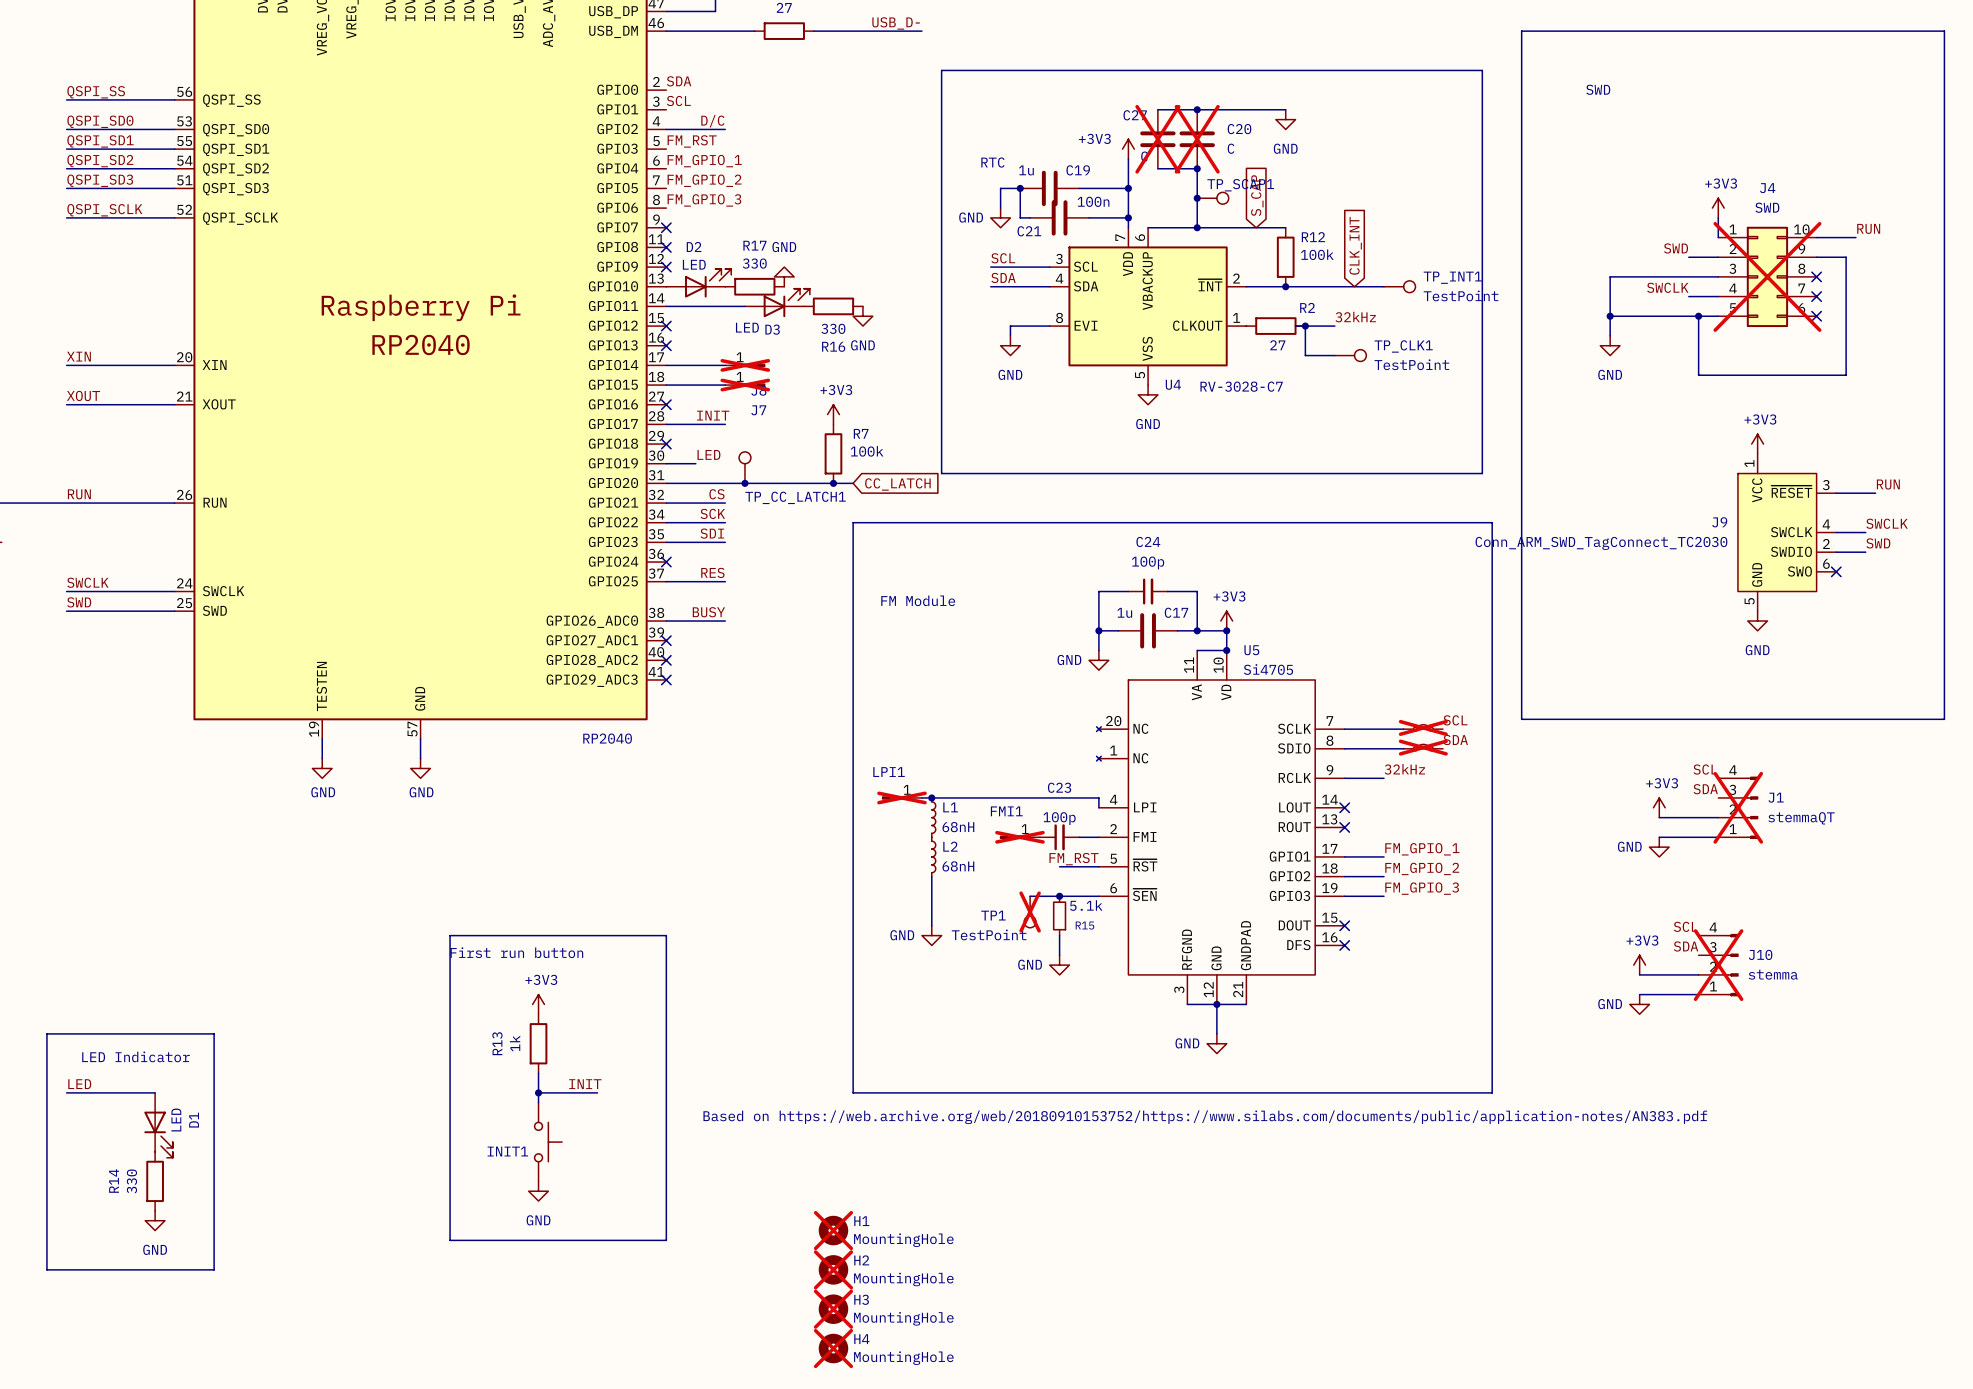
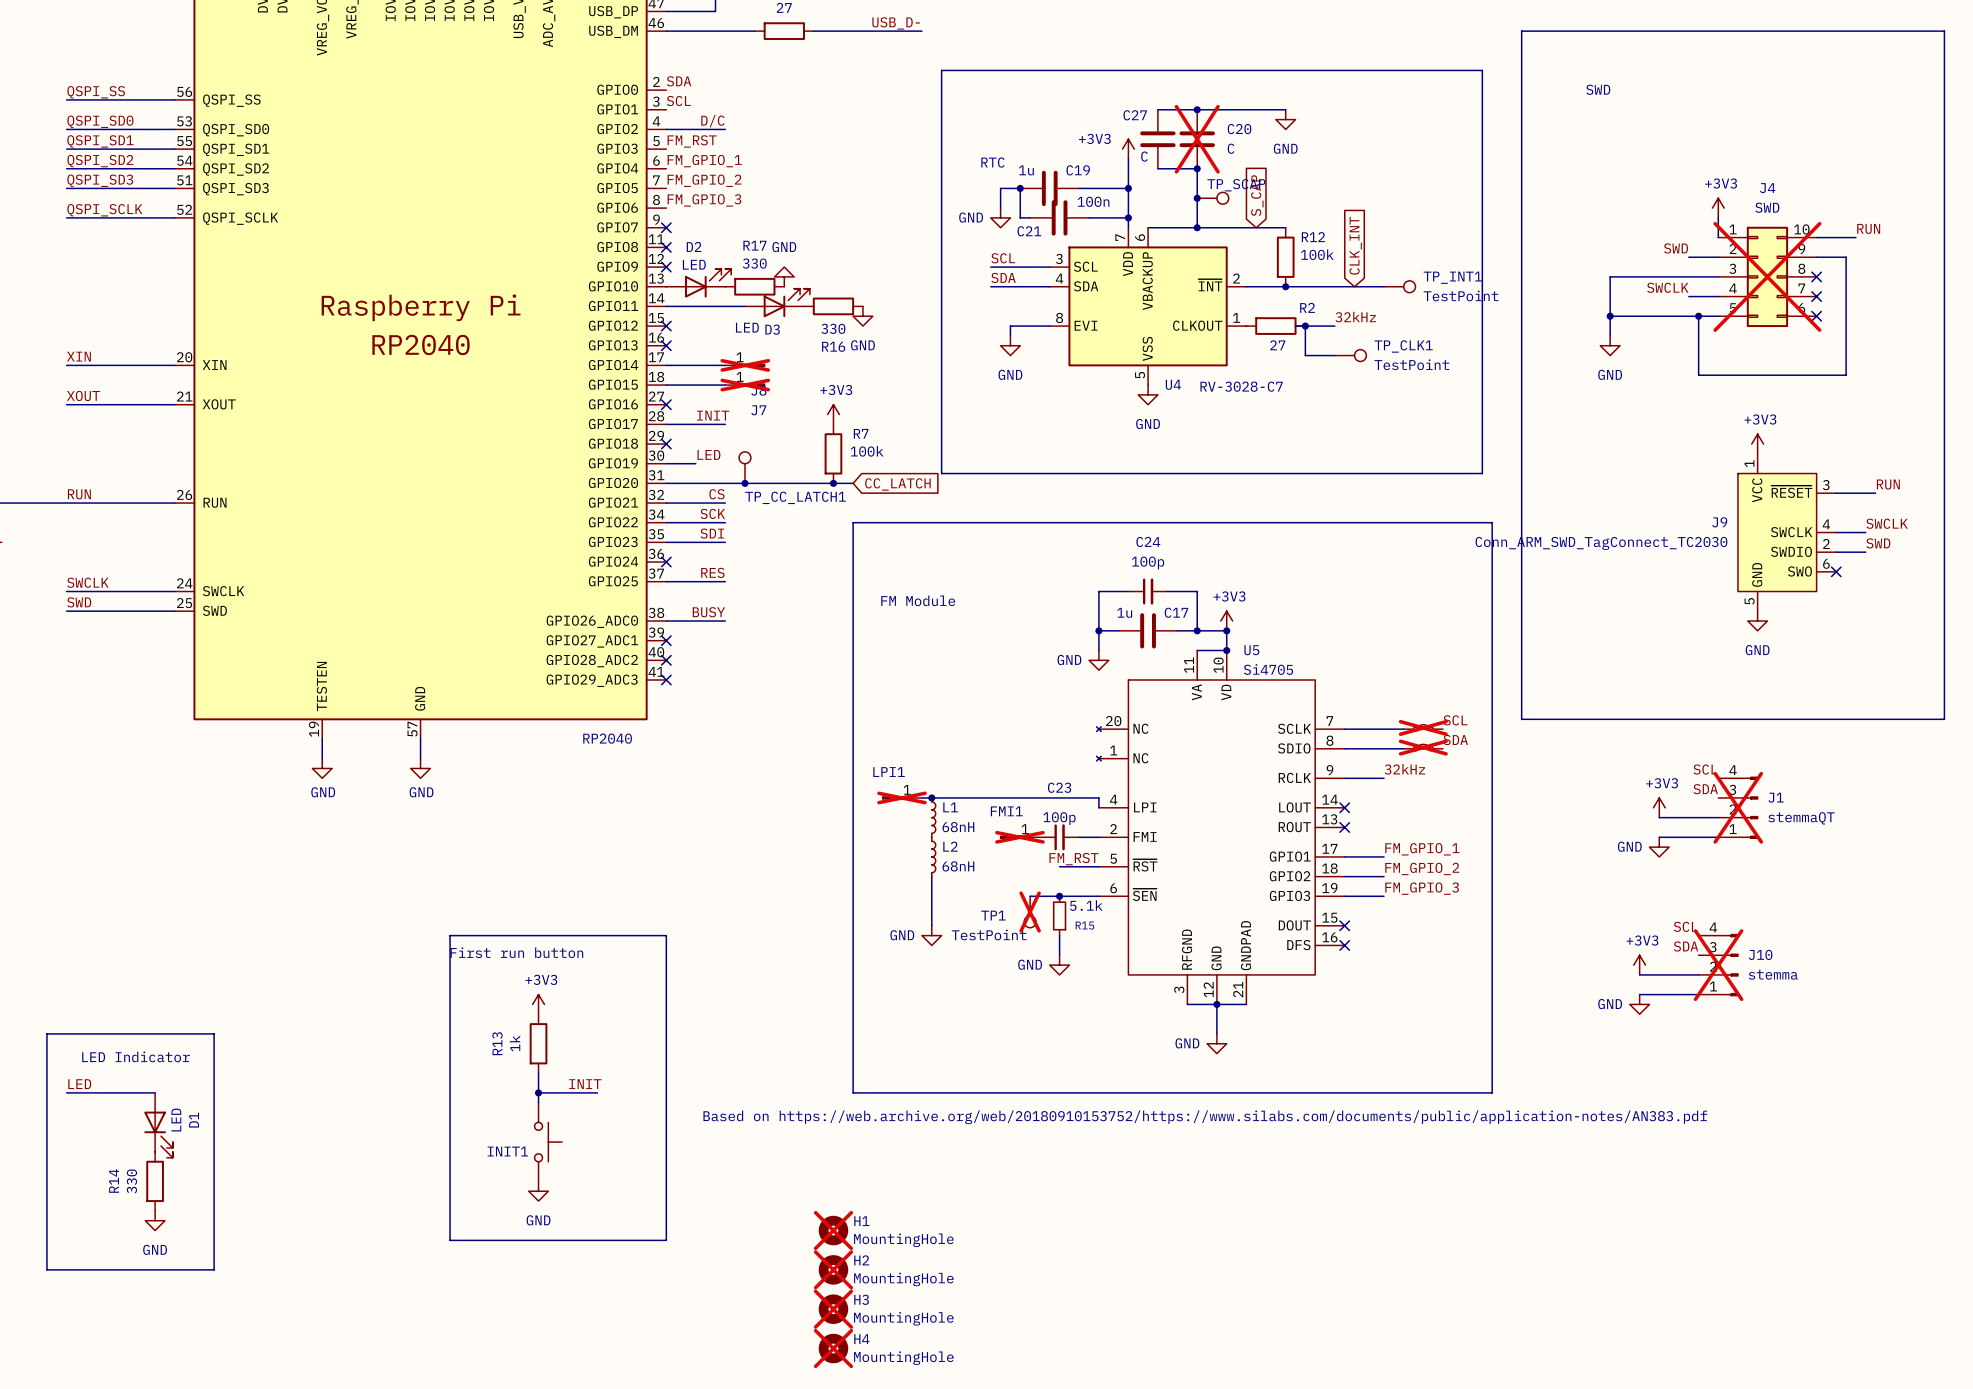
C27 do-not-place cross: (1157, 139) -> none
TP_SCAP1 name: TP_SCAP1 (1240, 185) -> TP_SCAP (1236, 185)

